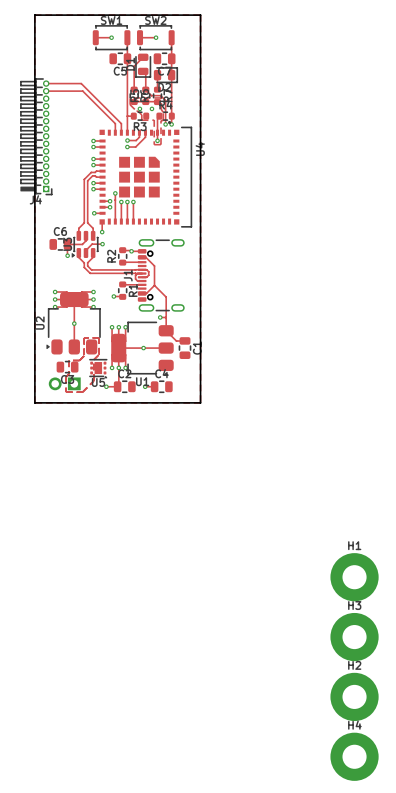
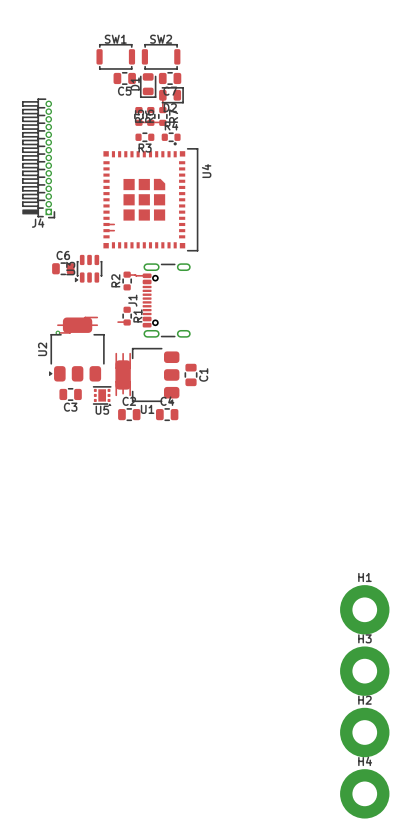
board edge: (34, 15) (200, 15) (200, 402) (34, 402) (34, 15) -> none
track: (95, 37) (111, 37) -> none
via: (111, 37) -> none
track: (127, 37) (127, 132) -> none
track: (140, 37) (156, 37) -> none
via: (156, 37) -> none
track: (171, 37) (171, 124) -> none
track: (143, 57) (134, 66) (134, 89) -> none
track: (143, 71) (145, 73) (145, 89) (151, 95) (160, 95) (165, 100) (165, 124) -> none
track: (46, 83) (81, 83) (121, 123) (121, 132) -> none
track: (46, 91) (82, 91) (115, 123) (115, 132) -> none
zone outline: (130, 97) (161, 98) (163, 120) (161, 120) (161, 144) (154, 144) (154, 120) (141, 120) (141, 114) (130, 104) (130, 97) -> none
via: (139, 108) -> none
via: (151, 108) -> none
track: (127, 116) (134, 116) -> none
track: (157, 119) (157, 140) -> none
via: (165, 124) -> none
via: (171, 124) -> none
track: (139, 132) (139, 137) (136, 140) (127, 140) -> none
track: (145, 132) (145, 137) (135, 147) (127, 147) -> none
via: (127, 140) -> none
via: (157, 140) -> none
track: (93, 141) (102, 141) -> none
via: (93, 141) -> none
track: (93, 147) (102, 147) -> none
via: (93, 147) -> none
via: (127, 147) -> none
track: (93, 159) (102, 159) -> none
via: (93, 159) -> none
track: (93, 165) (102, 165) -> none
via: (93, 165) -> none
track: (102, 171) (91, 172) (84, 179) (84, 222) (78, 228) (78, 235) -> none
track: (102, 177) (92, 175) (87, 180) (87, 222) (93, 228) (93, 235) -> none
track: (93, 183) (102, 183) -> none
via: (93, 183) -> none
track: (93, 189) (102, 189) -> none
via: (93, 189) -> none
track: (115, 193) (115, 200) -> none
via: (115, 193) -> none
track: (115, 200) (115, 221) -> none
via: (110, 201) -> none
track: (121, 201) (121, 221) -> none
via: (121, 201) -> none
track: (127, 201) (127, 221) -> none
via: (127, 201) -> none
track: (133, 201) (133, 221) -> none
via: (133, 201) -> none
via: (110, 207) -> none
track: (94, 213) (102, 213) -> none
via: (94, 213) -> none
track: (102, 221) (102, 232) -> none
via: (102, 232) -> none
track: (85, 235) (85, 240) (82, 244) (67, 244) (67, 255) -> none
track: (102, 244) (92, 244) (85, 250) (85, 253) -> none
via: (102, 244) -> none
via: (131, 251) -> none
track: (78, 253) (78, 257) (84, 262) (84, 267) (90, 273) (142, 273) -> none
track: (93, 253) (93, 257) (87, 262) (87, 266) (91, 269) (146, 269) (148, 275) (142, 277) -> none
via: (67, 255) -> none
track: (142, 257) (145, 257) (154, 265) (154, 285) -> none
track: (122, 262) (142, 262) -> none
track: (137, 273) (135, 279) (142, 281) -> none
track: (122, 284) (142, 284) -> none
track: (154, 285) (146, 293) (142, 293) -> none
track: (154, 285) (166, 297) (166, 330) (176, 341) (185, 341) -> none
track: (55, 292) (66, 292) (81, 307) (93, 307) -> none
via: (55, 292) -> none
via: (93, 292) -> none
via: (113, 296) -> none
via: (55, 299) -> none
track: (74, 299) (74, 346) -> none
via: (93, 299) -> none
via: (93, 307) -> none
track: (160, 317) (166, 317) -> none
via: (160, 317) -> none
via: (74, 323) -> none
via: (112, 327) -> none
via: (118, 327) -> none
via: (125, 327) -> none
zone outline: (84, 337) (99, 337) (99, 354) (93, 359) (93, 380) (82, 392) (66, 392) (69, 360) (79, 360) (84, 356) (84, 337) -> none
track: (118, 348) (166, 348) -> none
via: (143, 348) -> none
track: (118, 366) (118, 385) (106, 386) -> none
via: (112, 367) -> none
via: (118, 367) -> none
via: (125, 367) -> none
part: (64, 383) -> none
via: (106, 386) -> none
track: (145, 386) (154, 386) -> none
via: (145, 386) -> none

